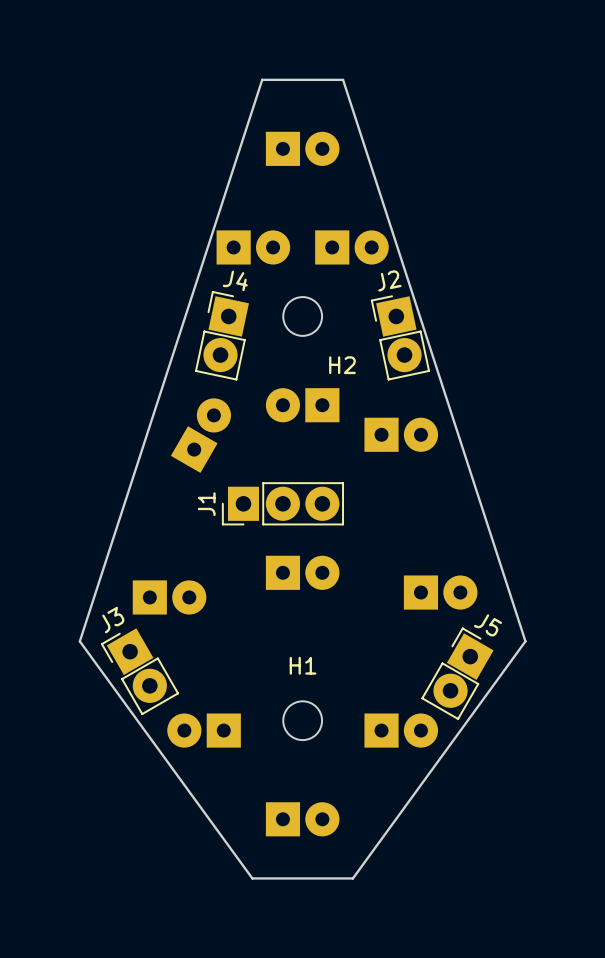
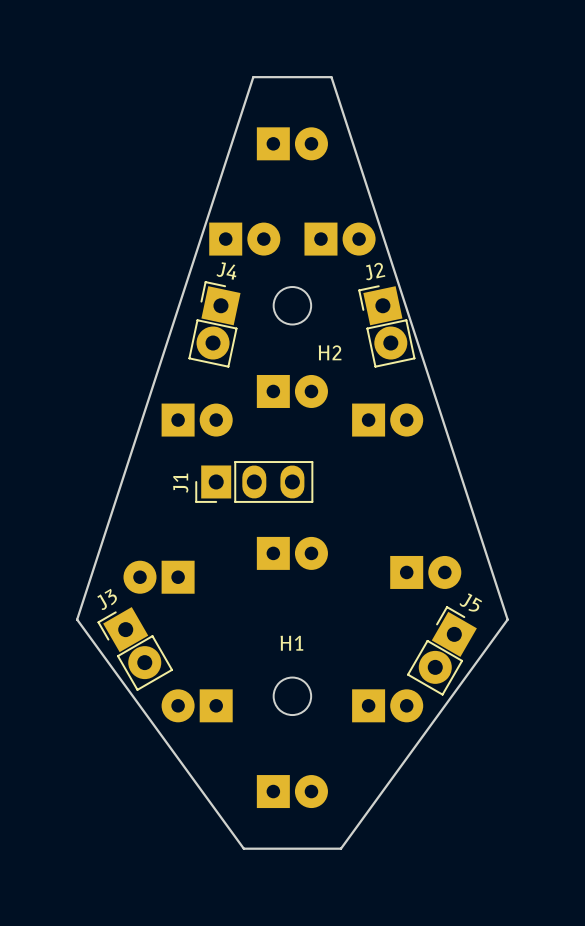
part rotation: 0° (302, 405) -> 180° (292, 391)
part rotation: 0° (200, 435) -> 60° clockwise (197, 420)
J1 footprint: [221, 482, 344, 526] -> [195, 461, 314, 503]
part rotation: 0° (169, 597) -> 180° (159, 577)

